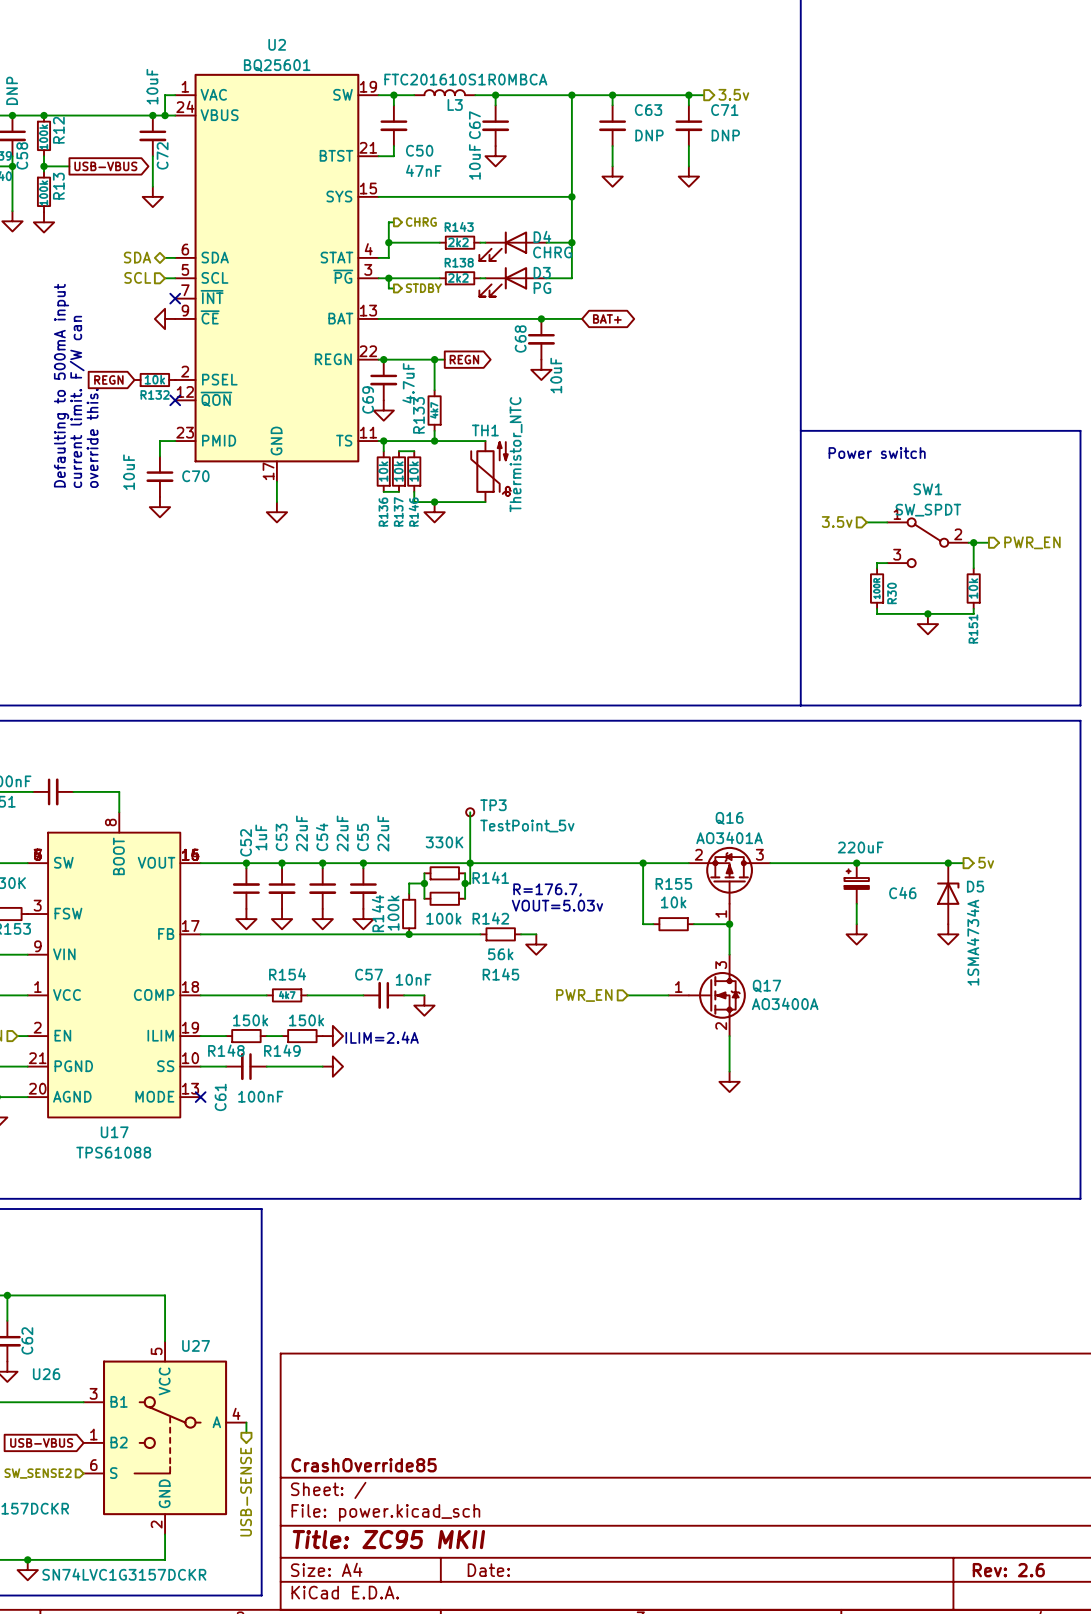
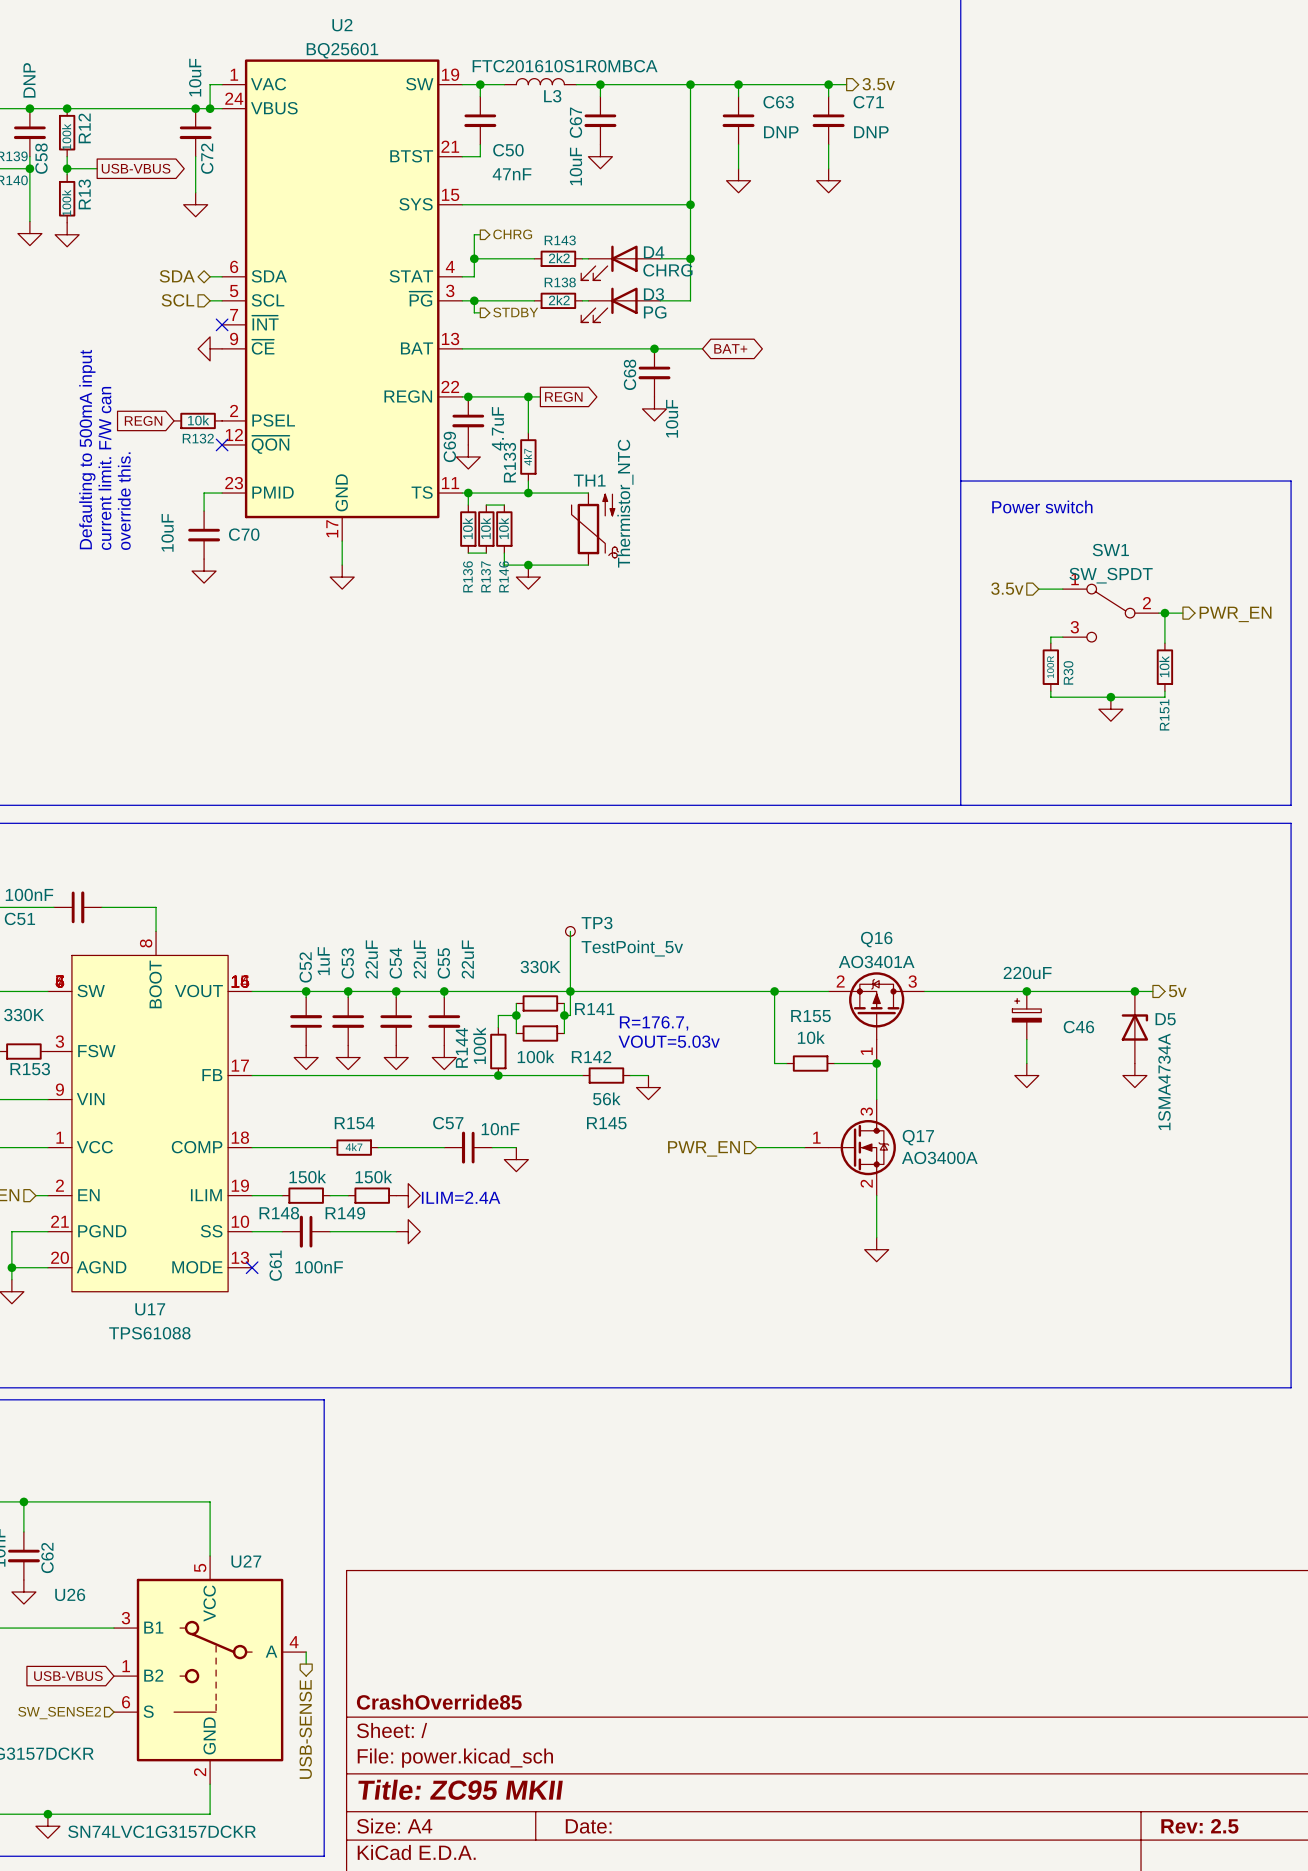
title block: Rev: 2.6 (1008, 1570) -> Rev: 2.5 (1199, 1826)

